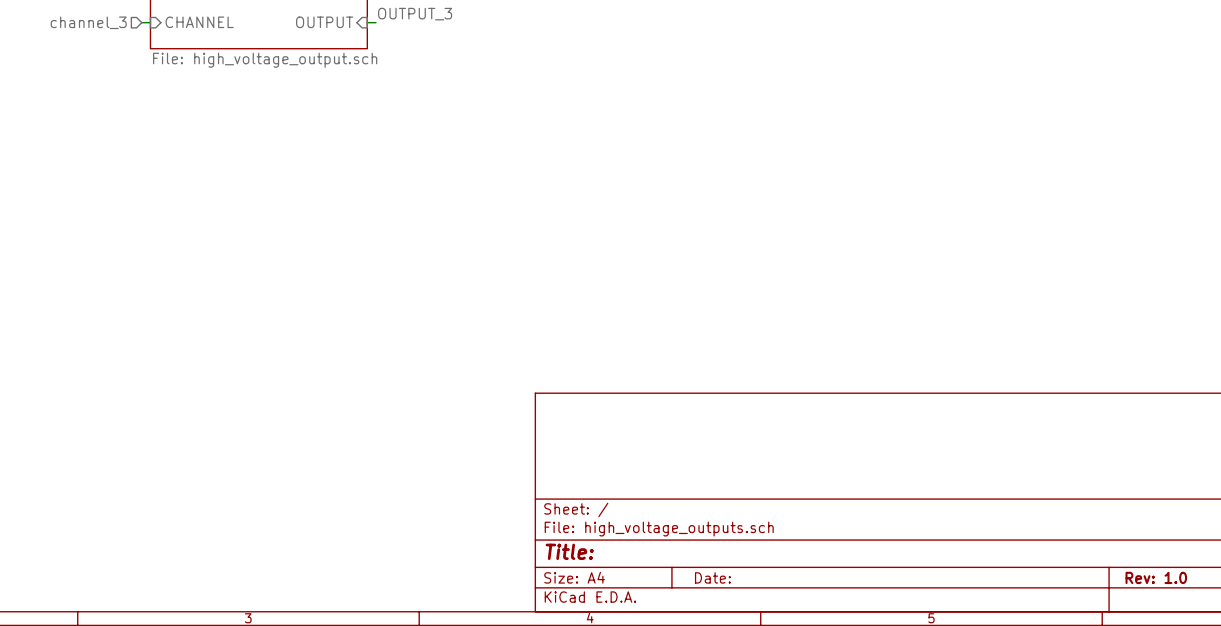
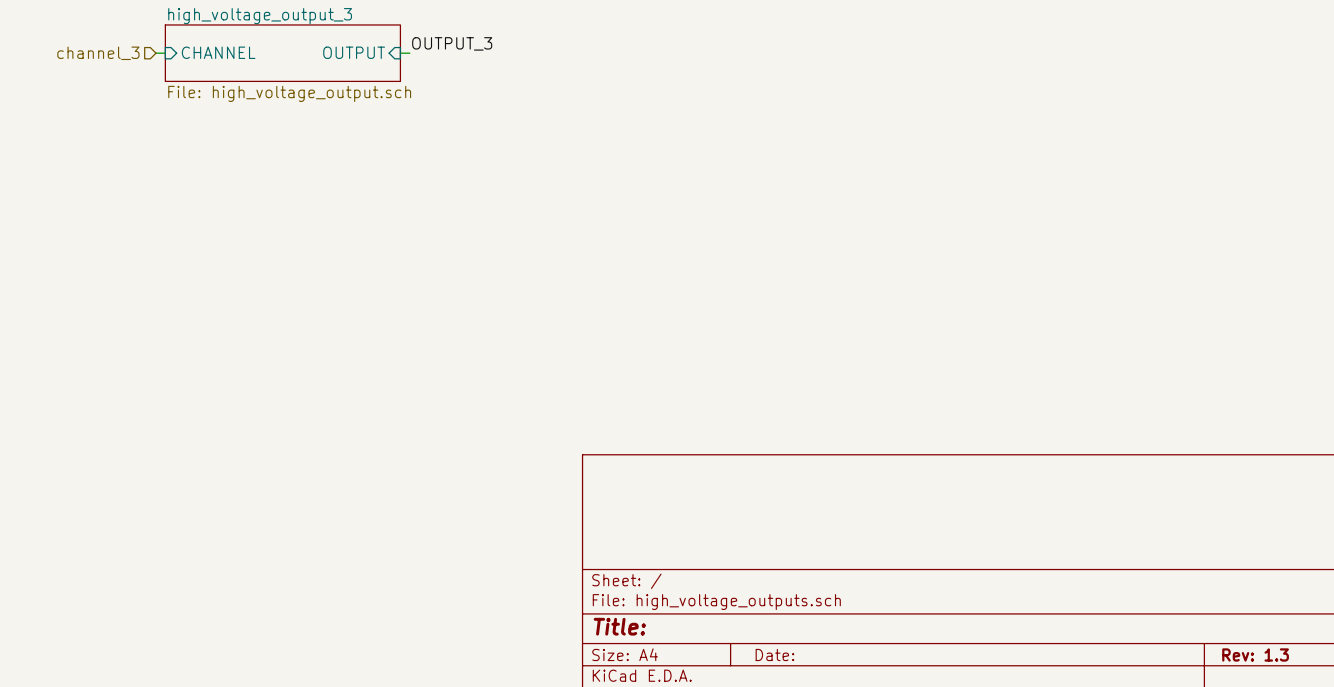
title block: Rev: 1.0 (1156, 577) -> Rev: 1.3 (1255, 654)

